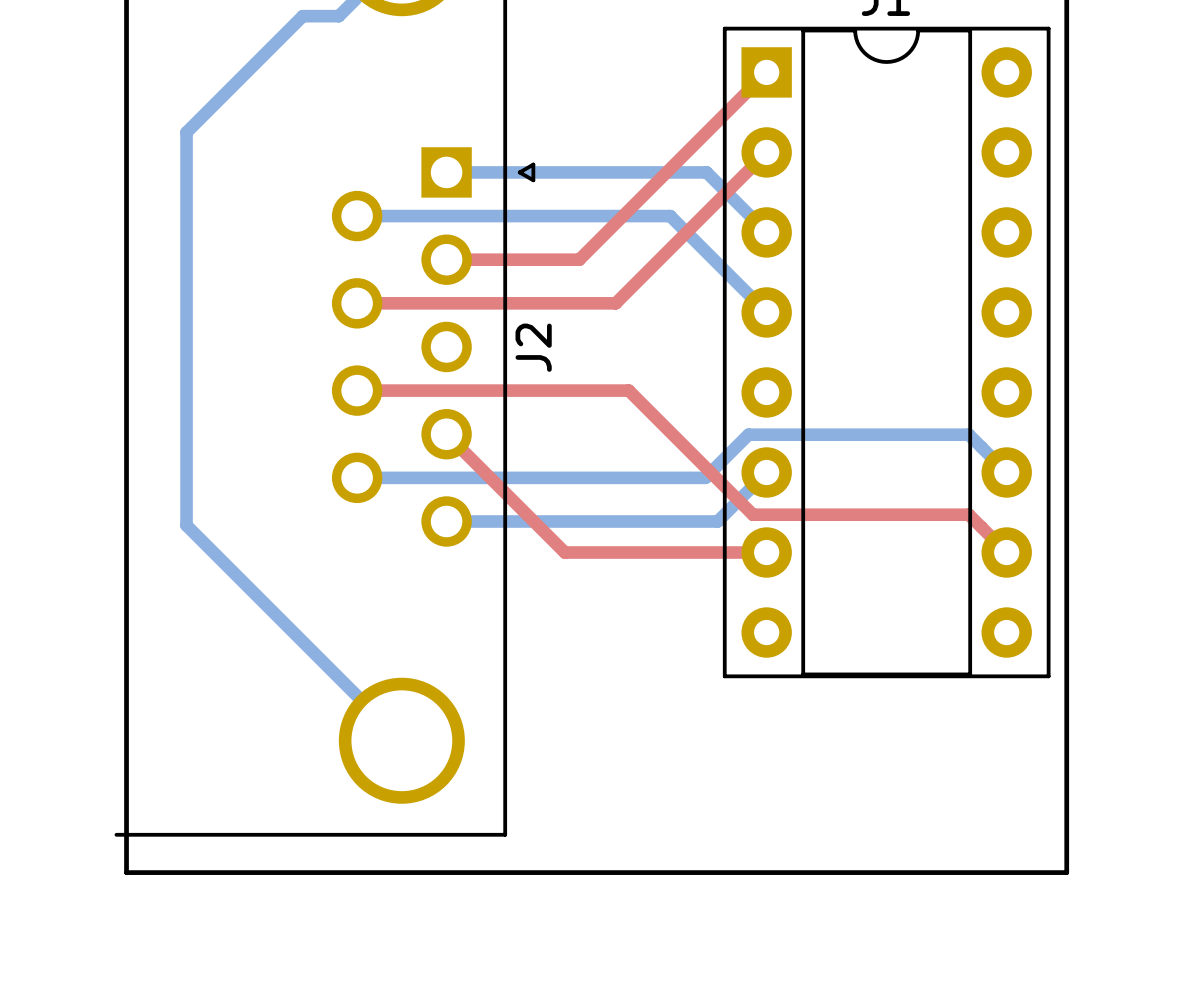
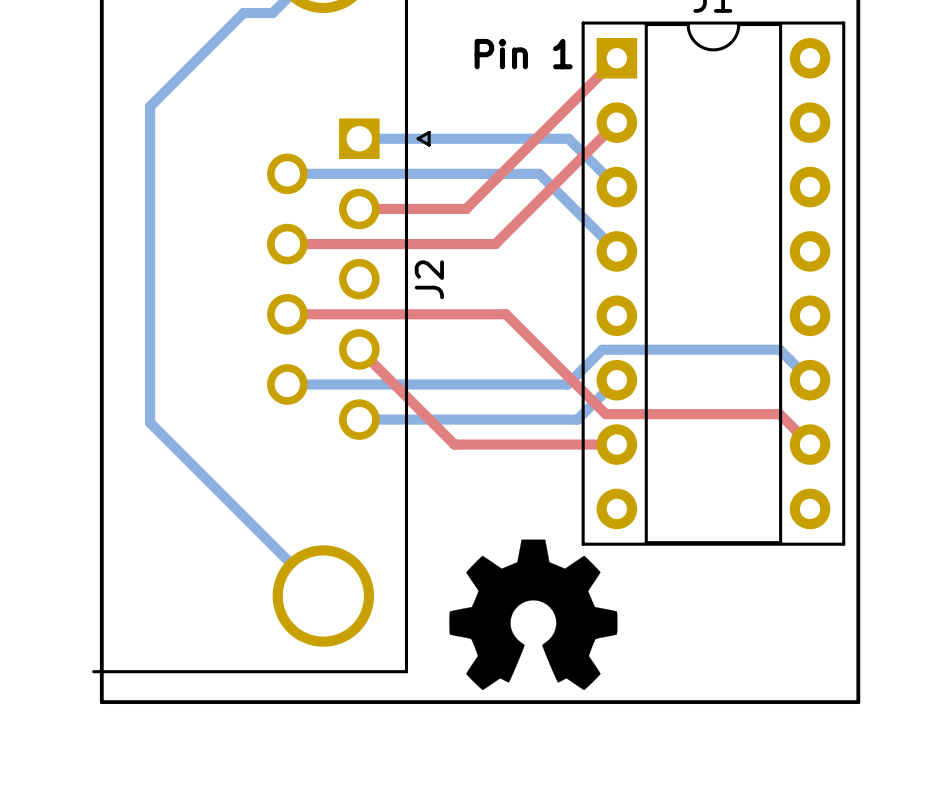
text: none -> Pin 1 (523, 54)
drawing: none -> [449, 539, 618, 691]

